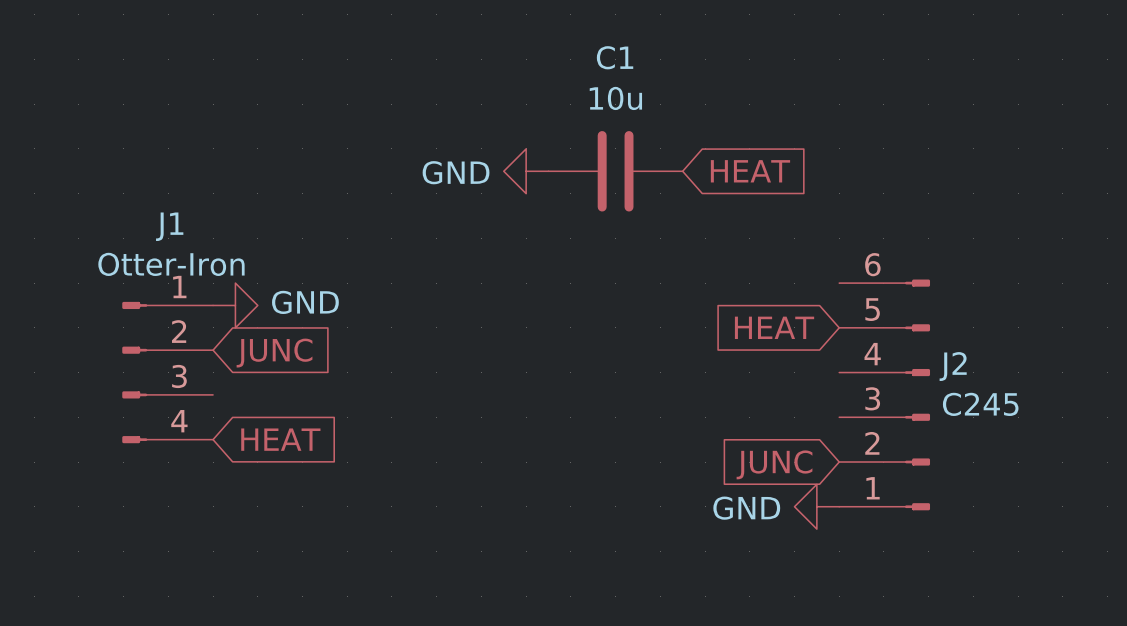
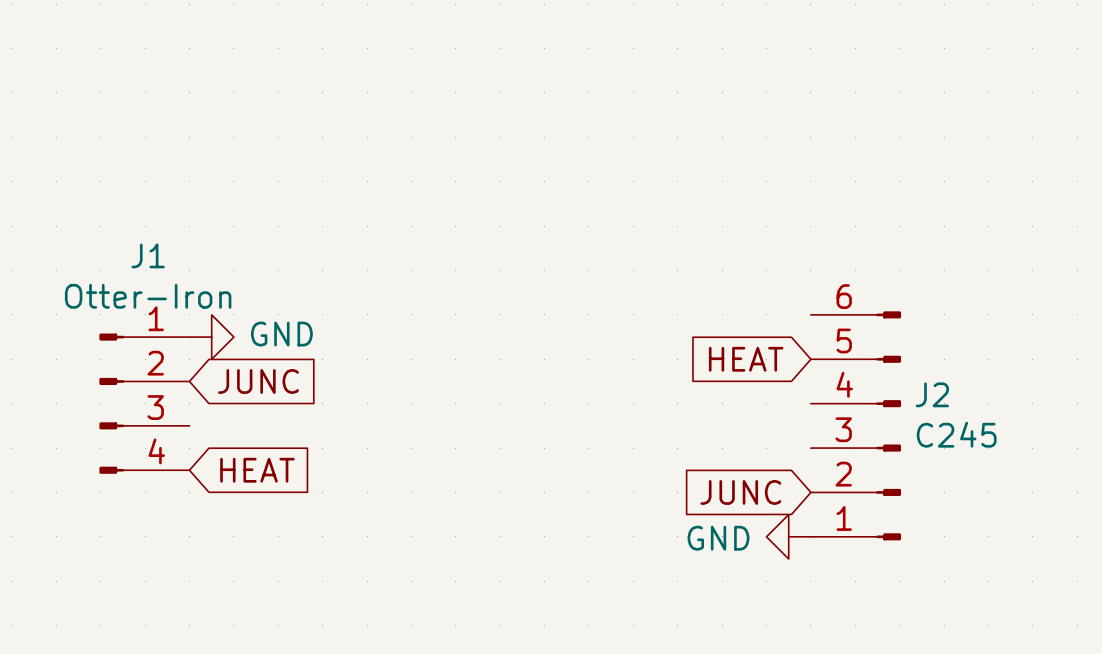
power symbol: GND (526, 171) -> none
C1: 10u (615, 171) -> none
global label: HEAT (750, 171) -> none

